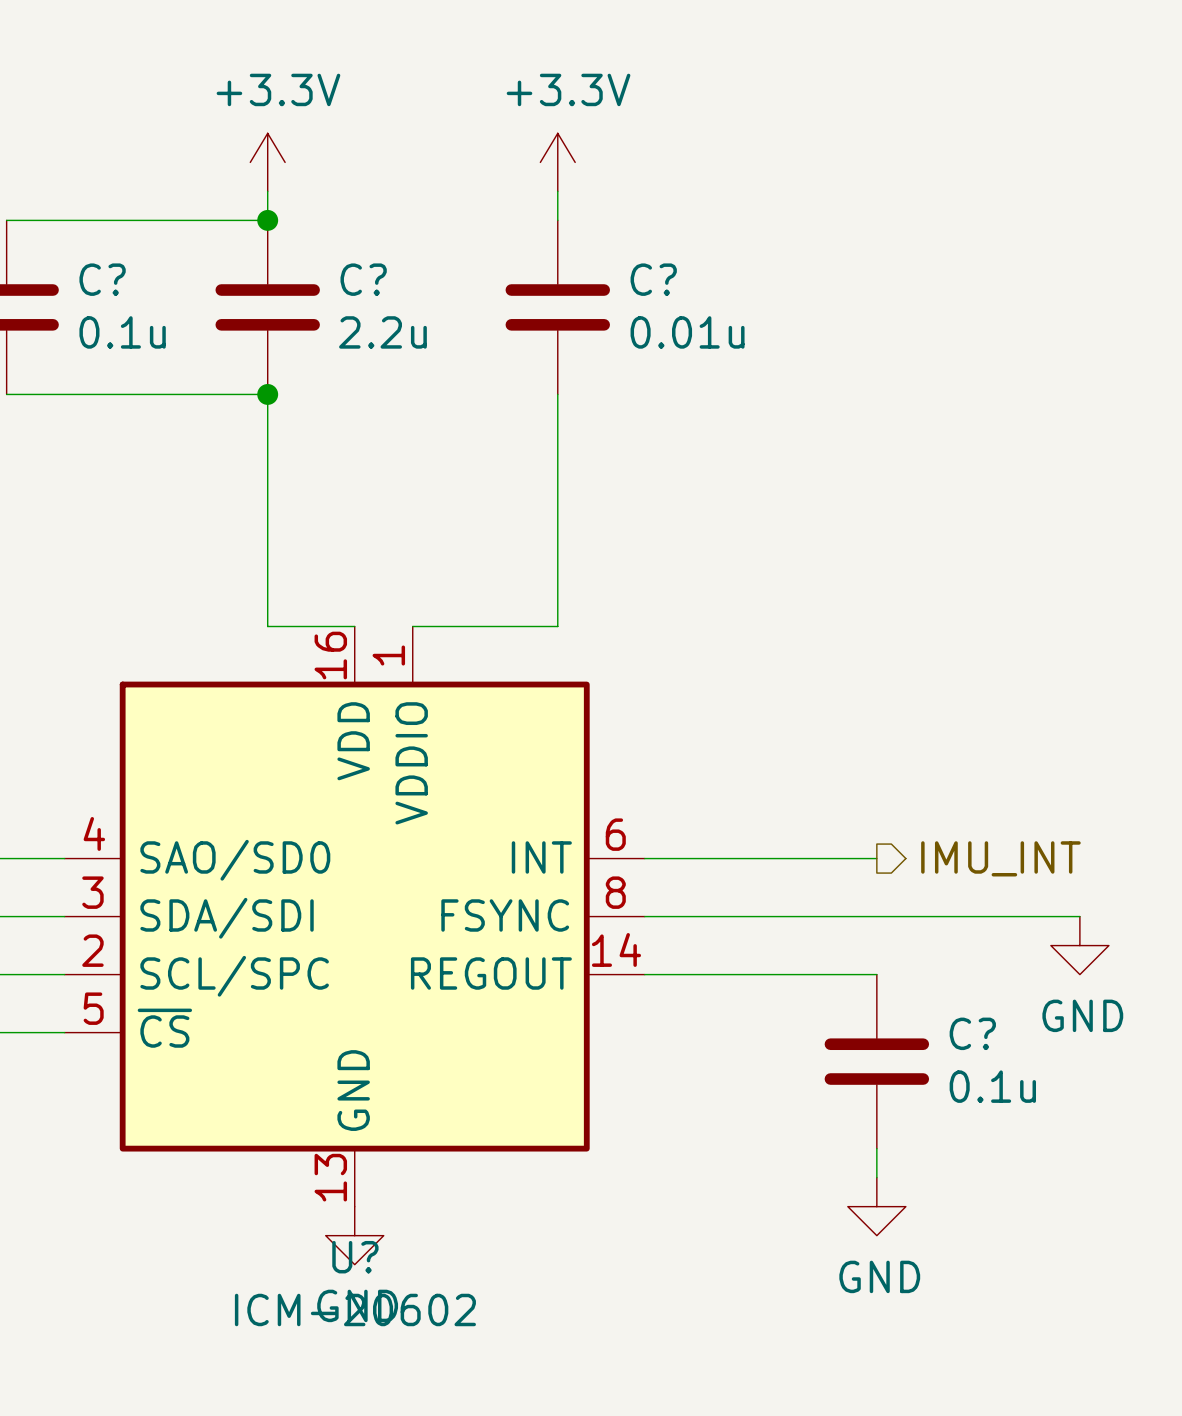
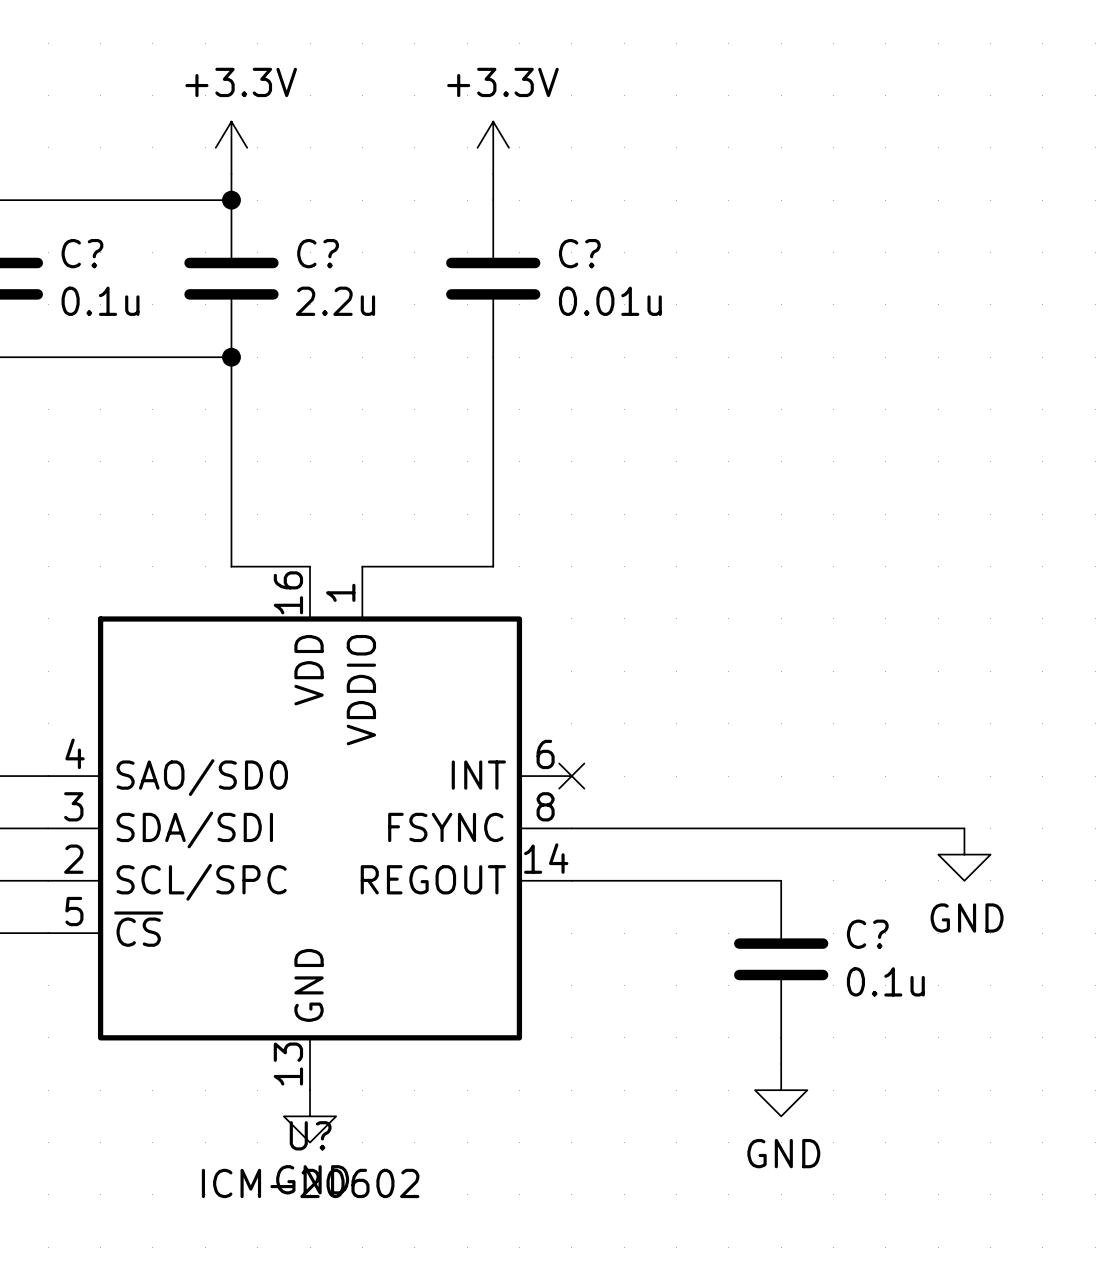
wire: (644, 858) (876, 858) -> none
no-connect mark: none -> (571, 776)
hierarchical label: IMU_INT (1000, 858) -> none

